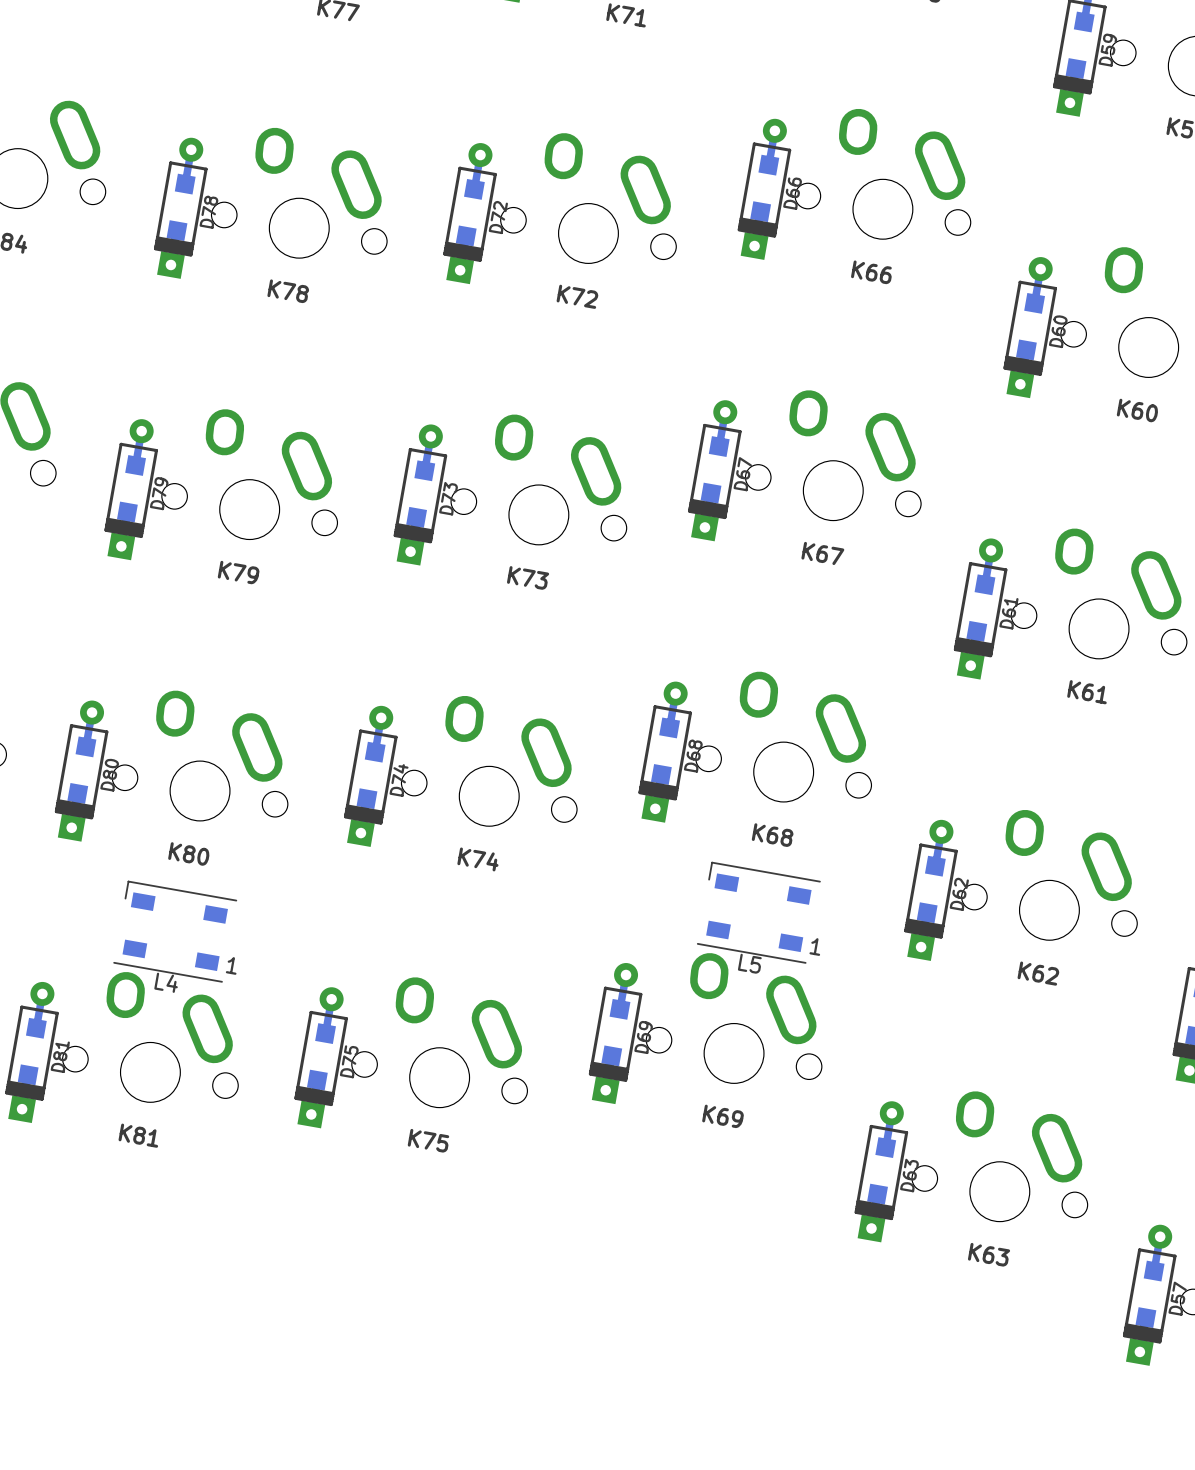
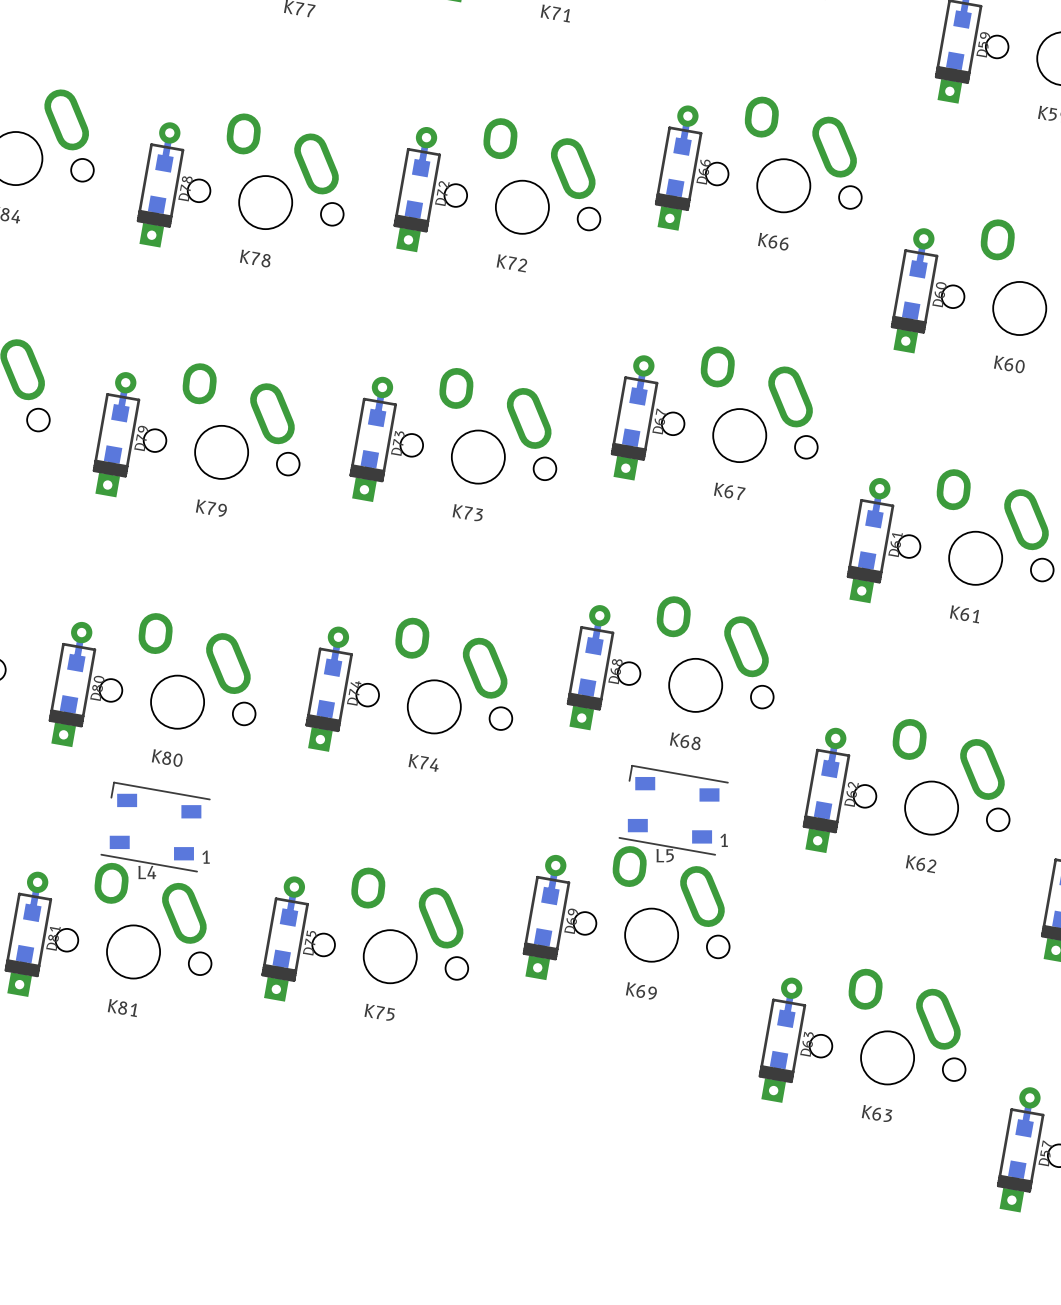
L5 footprint: [696, 861, 821, 964] -> [618, 764, 729, 856]
L4 footprint: [113, 880, 238, 983] -> [100, 781, 211, 873]

